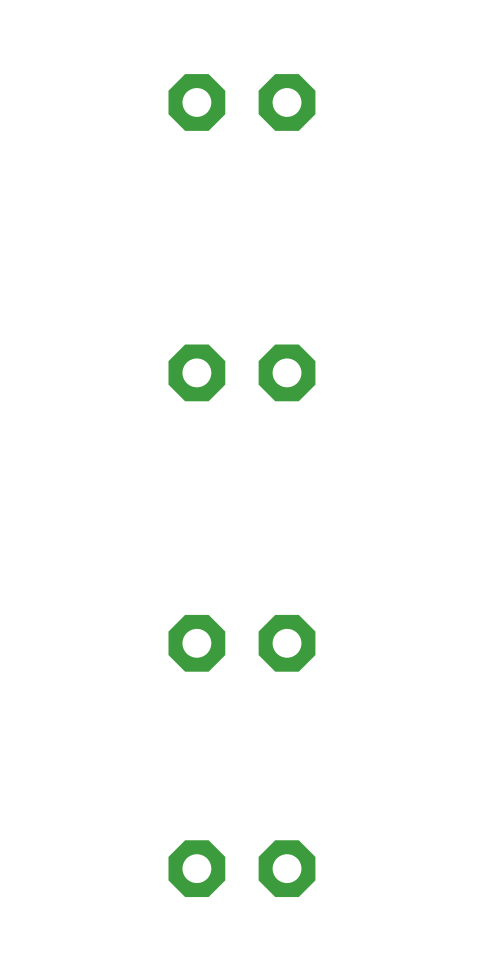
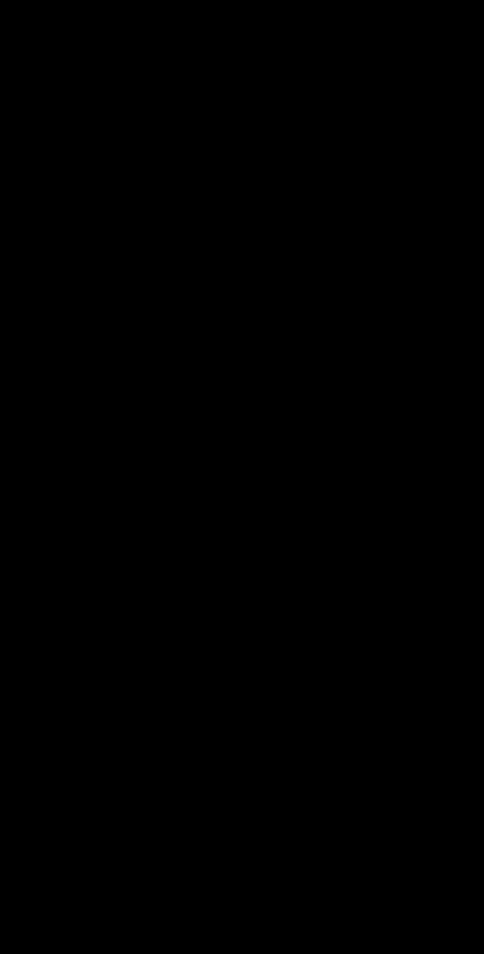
part: (241, 102) -> none
part: (241, 372) -> none
part: (241, 643) -> none
part: (241, 868) -> none

